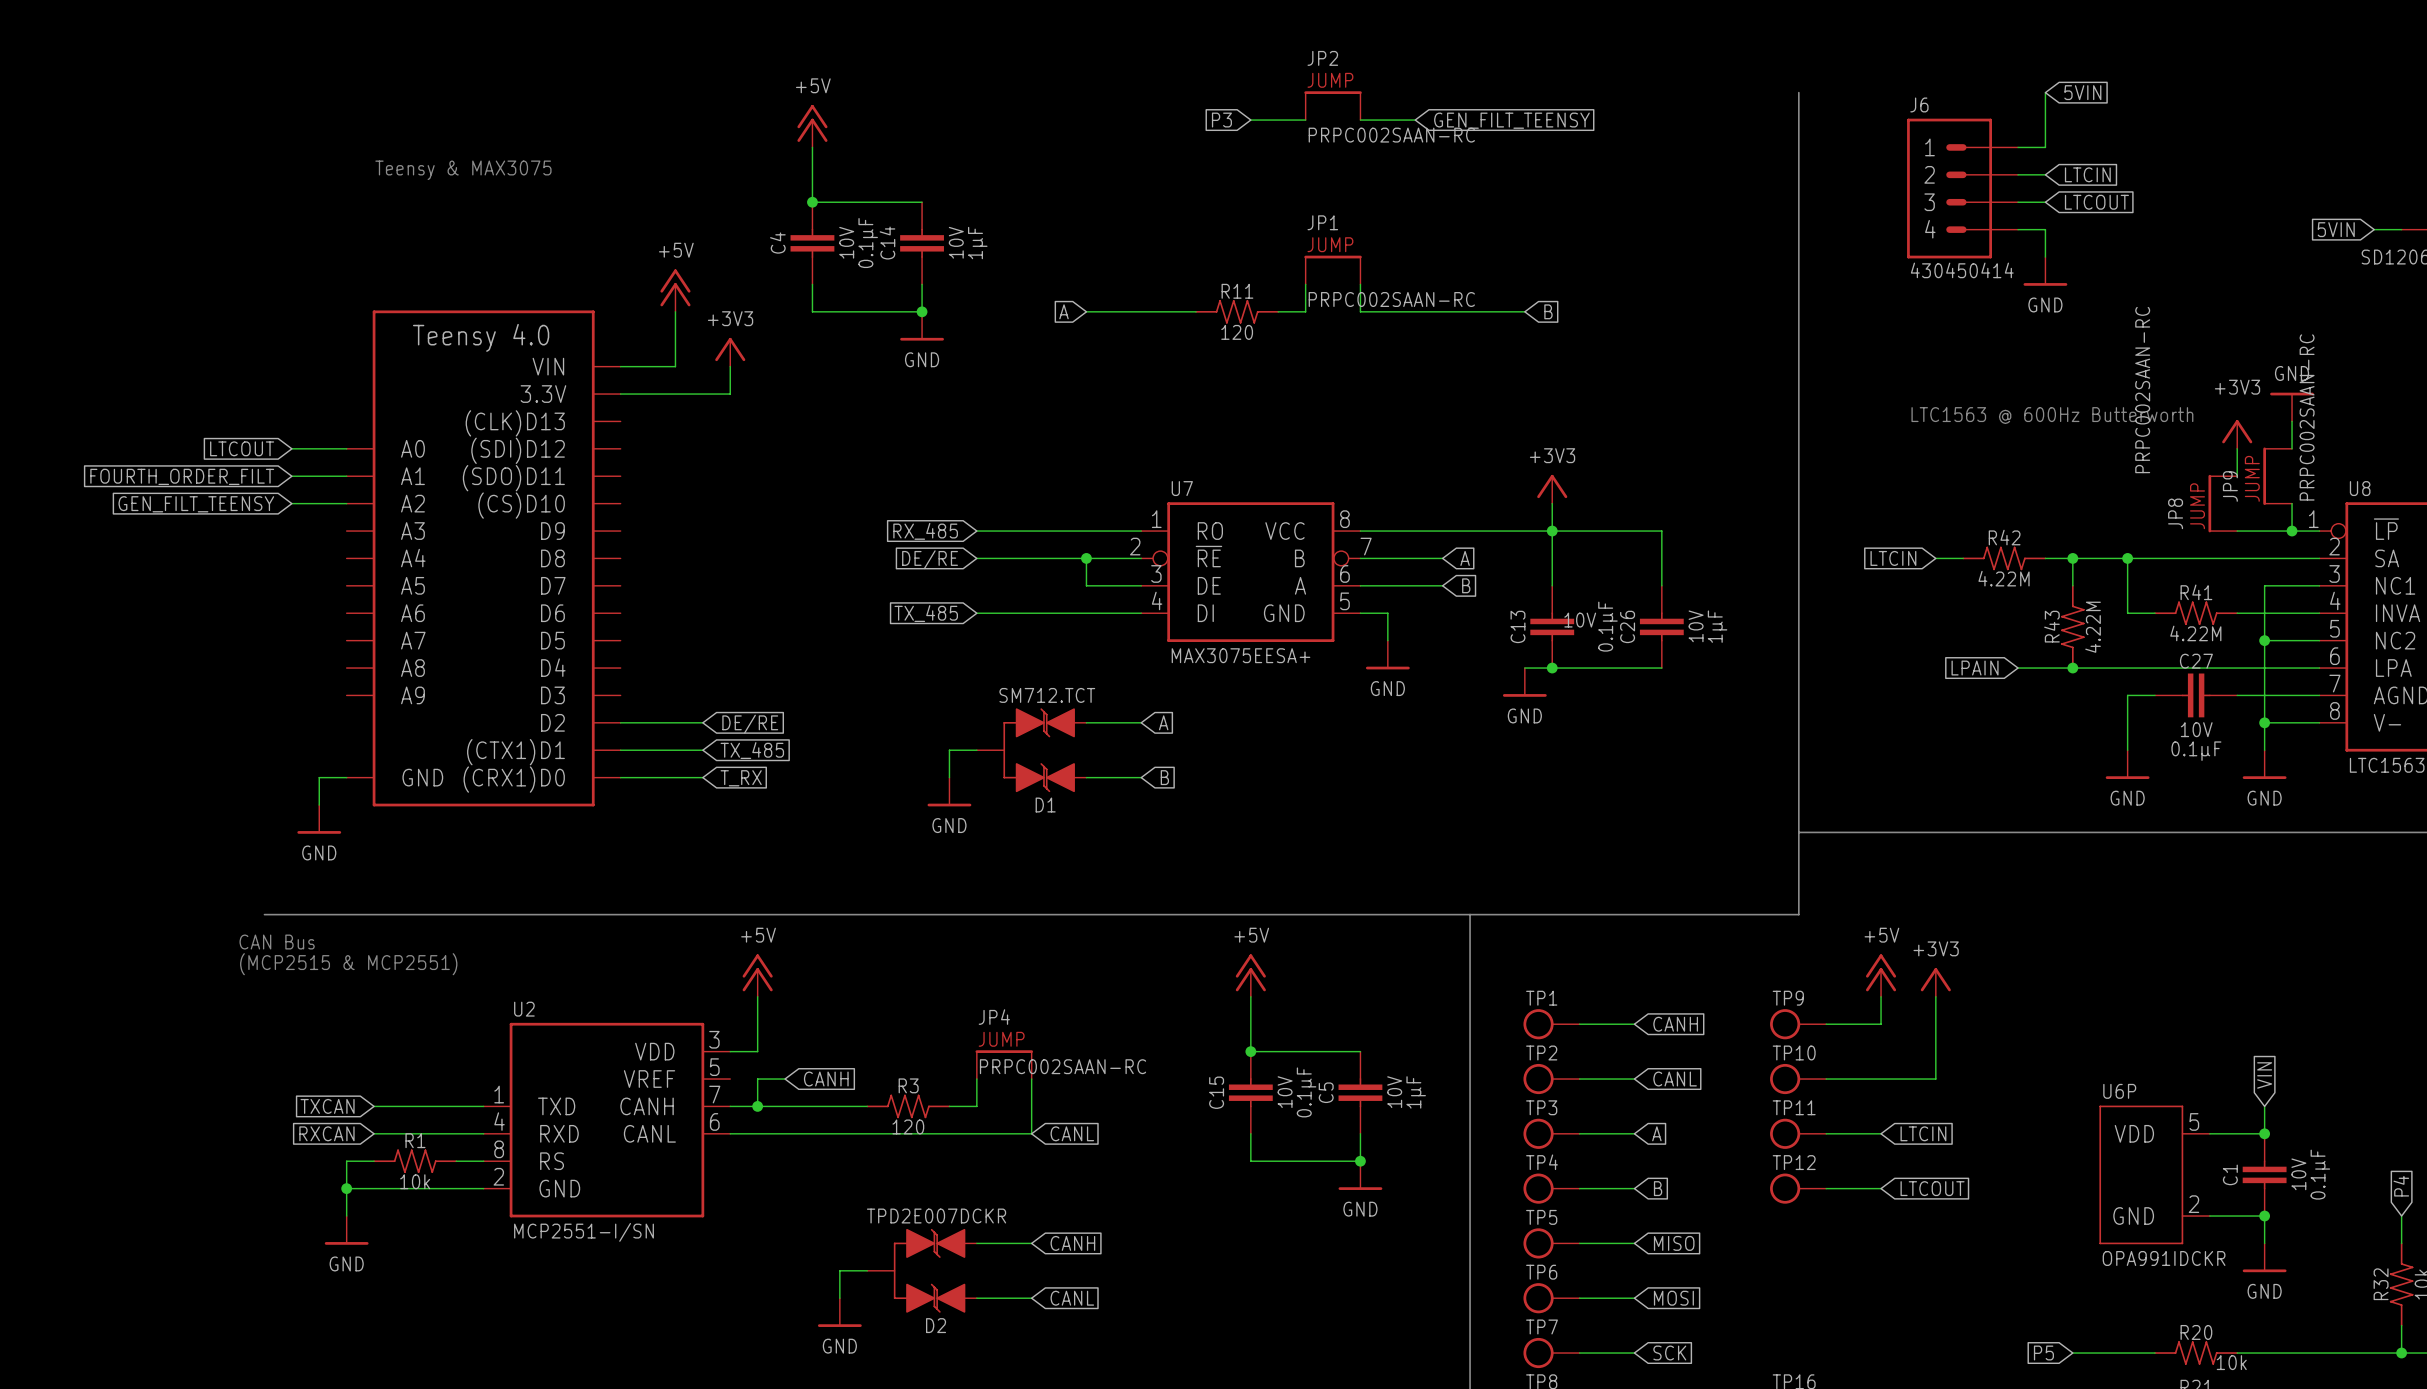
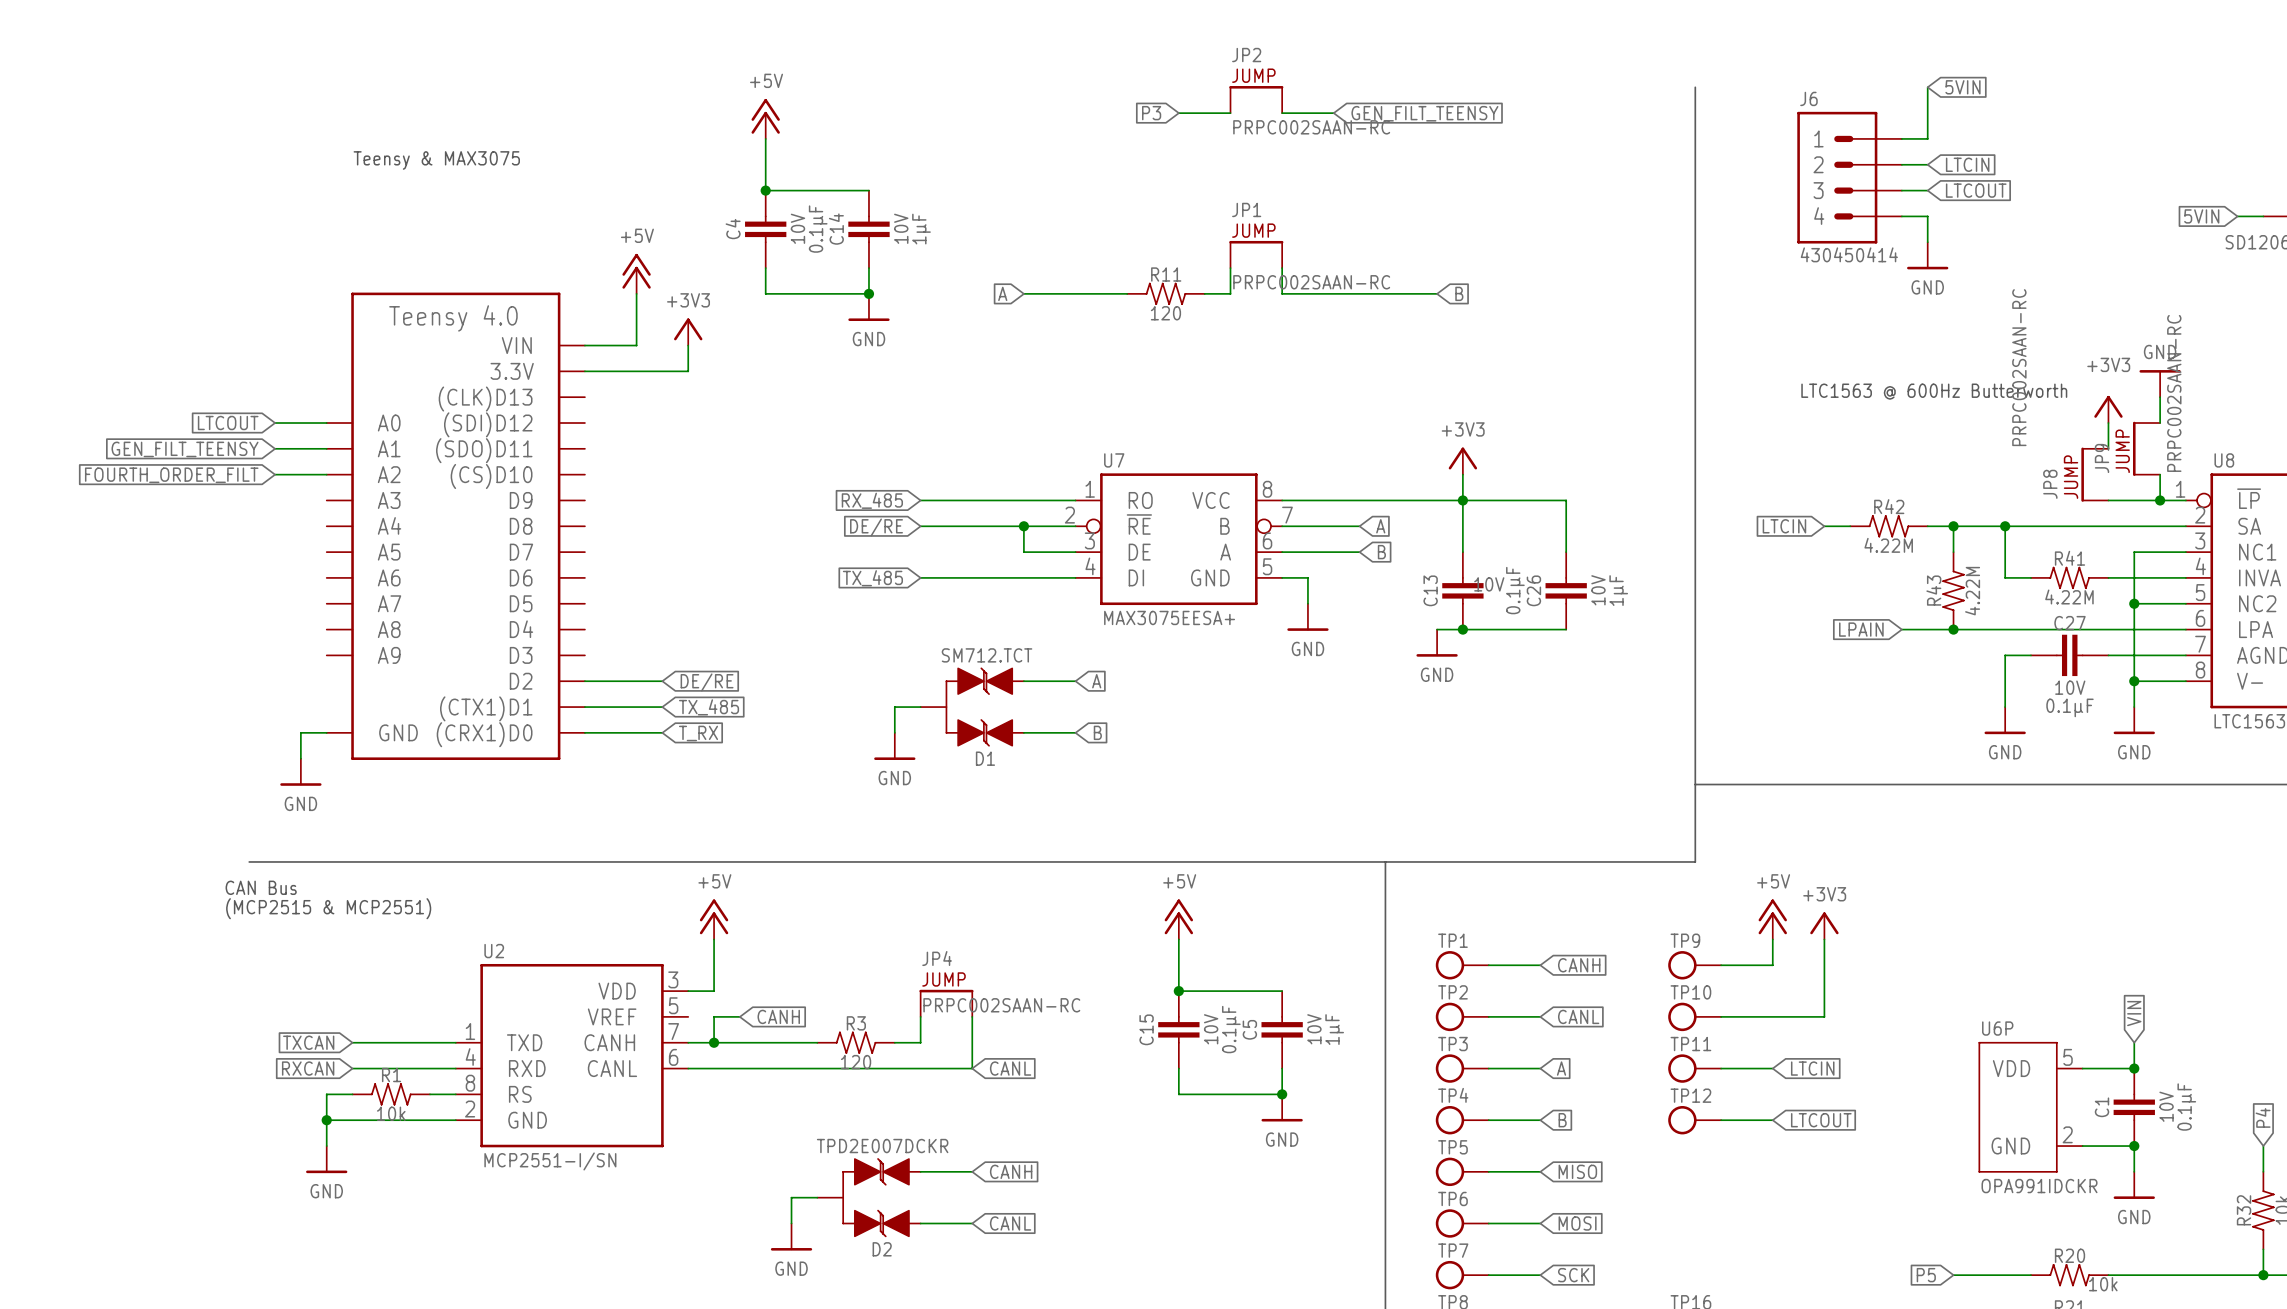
global label: FOURTH_ORDER_FILT (182, 476) -> GEN_FILT_TEENSY (185, 449)
global label: GEN_FILT_TEENSY (196, 504) -> FOURTH_ORDER_FILT (171, 475)

